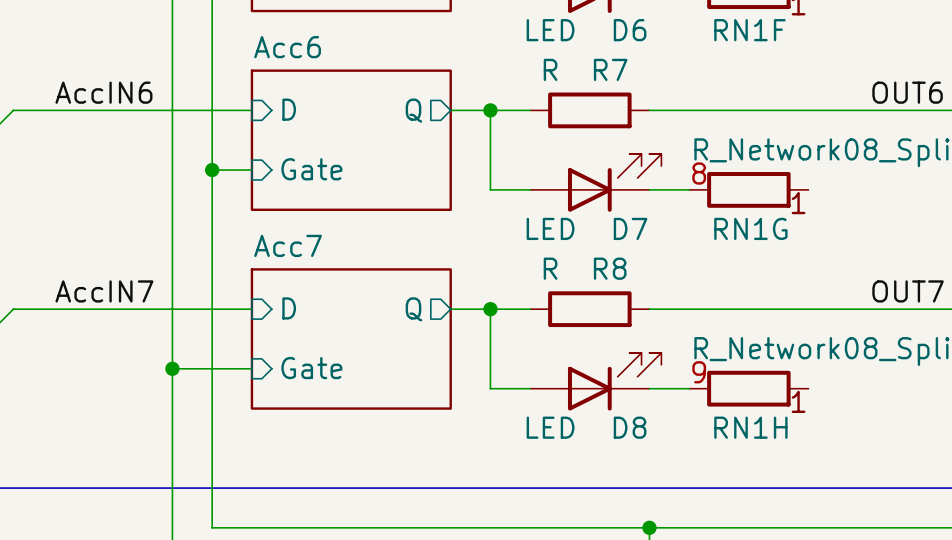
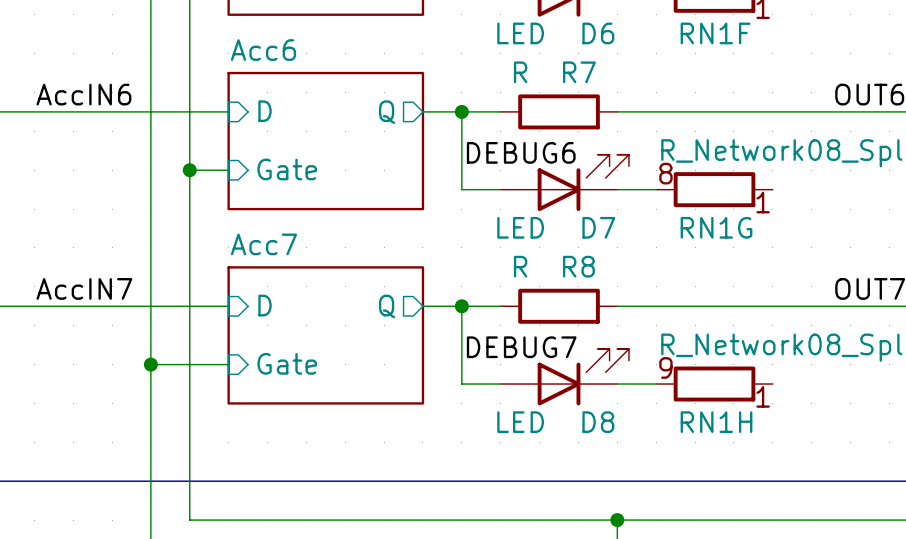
label: none -> DEBUG6 (521, 152)
label: none -> DEBUG7 (521, 347)

